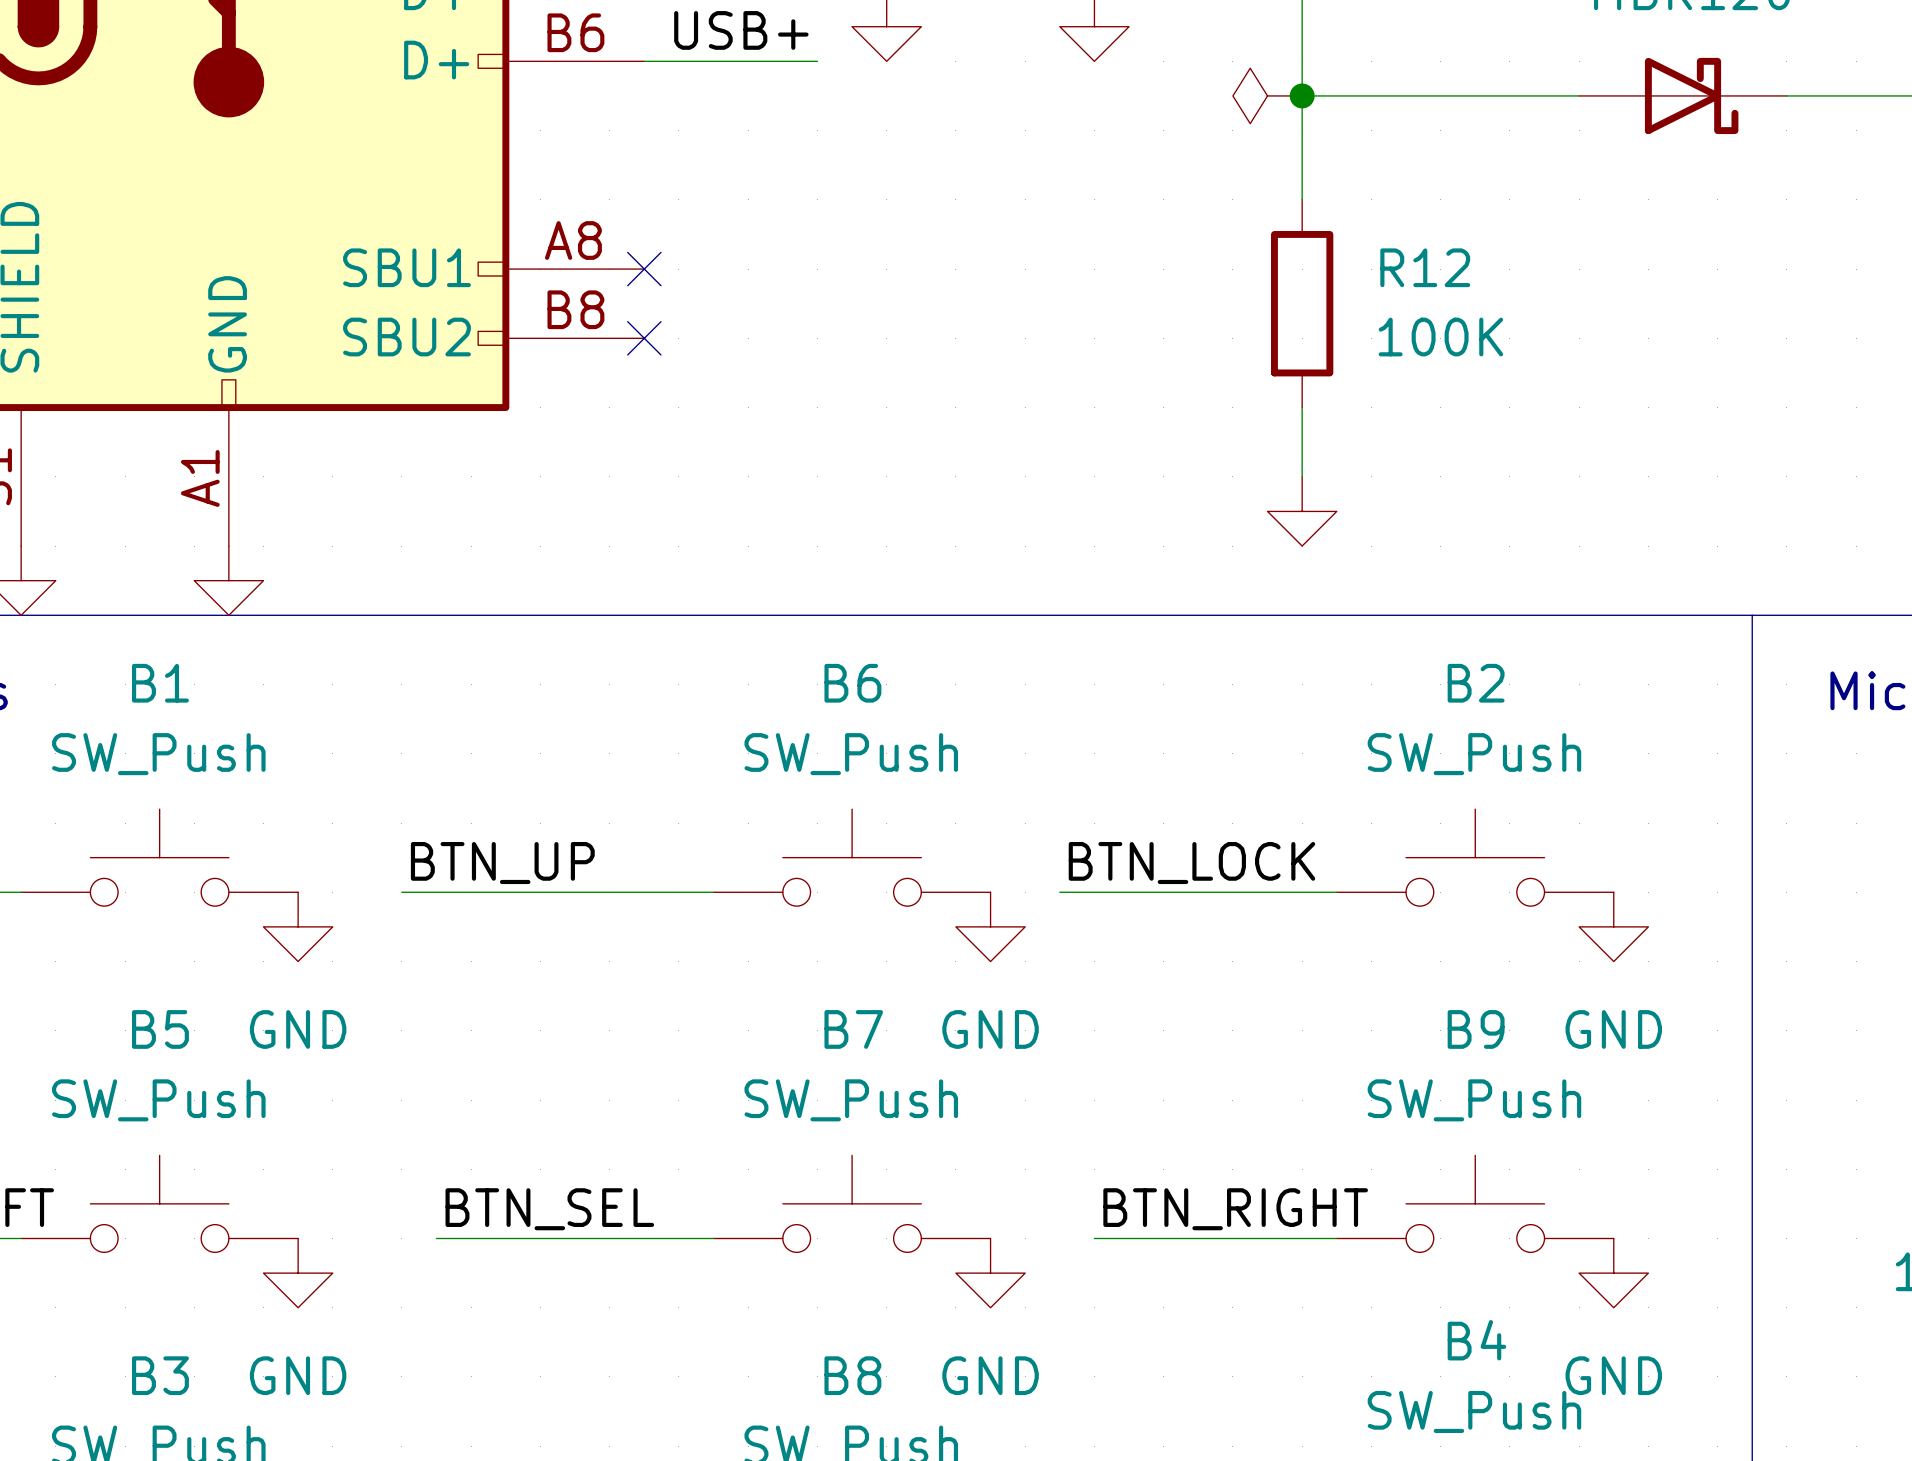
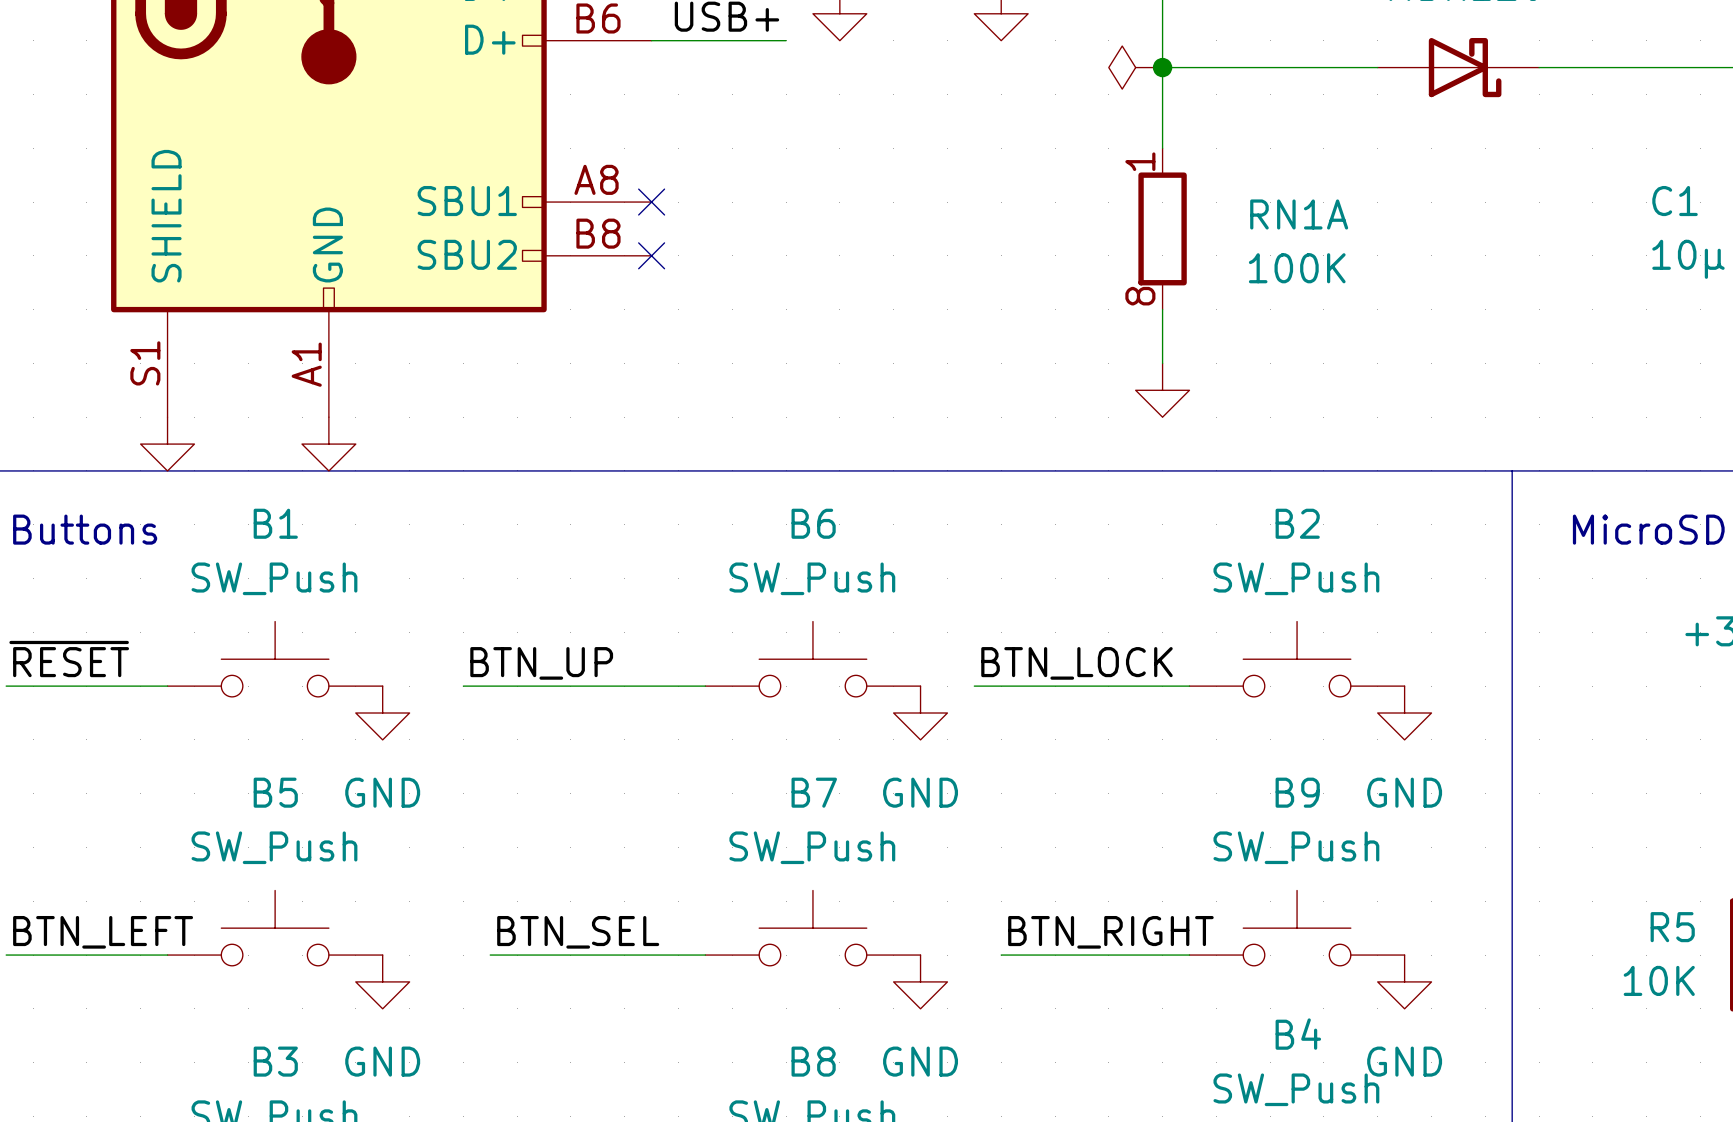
R12 pin number: none -> 1 (1140, 161)
R12 name: R12 (1425, 267) -> RN1A (1299, 214)
R12 value position: 100K (1440, 337) -> 100K (1297, 268)
R12 pin number: none -> 8 (1140, 296)

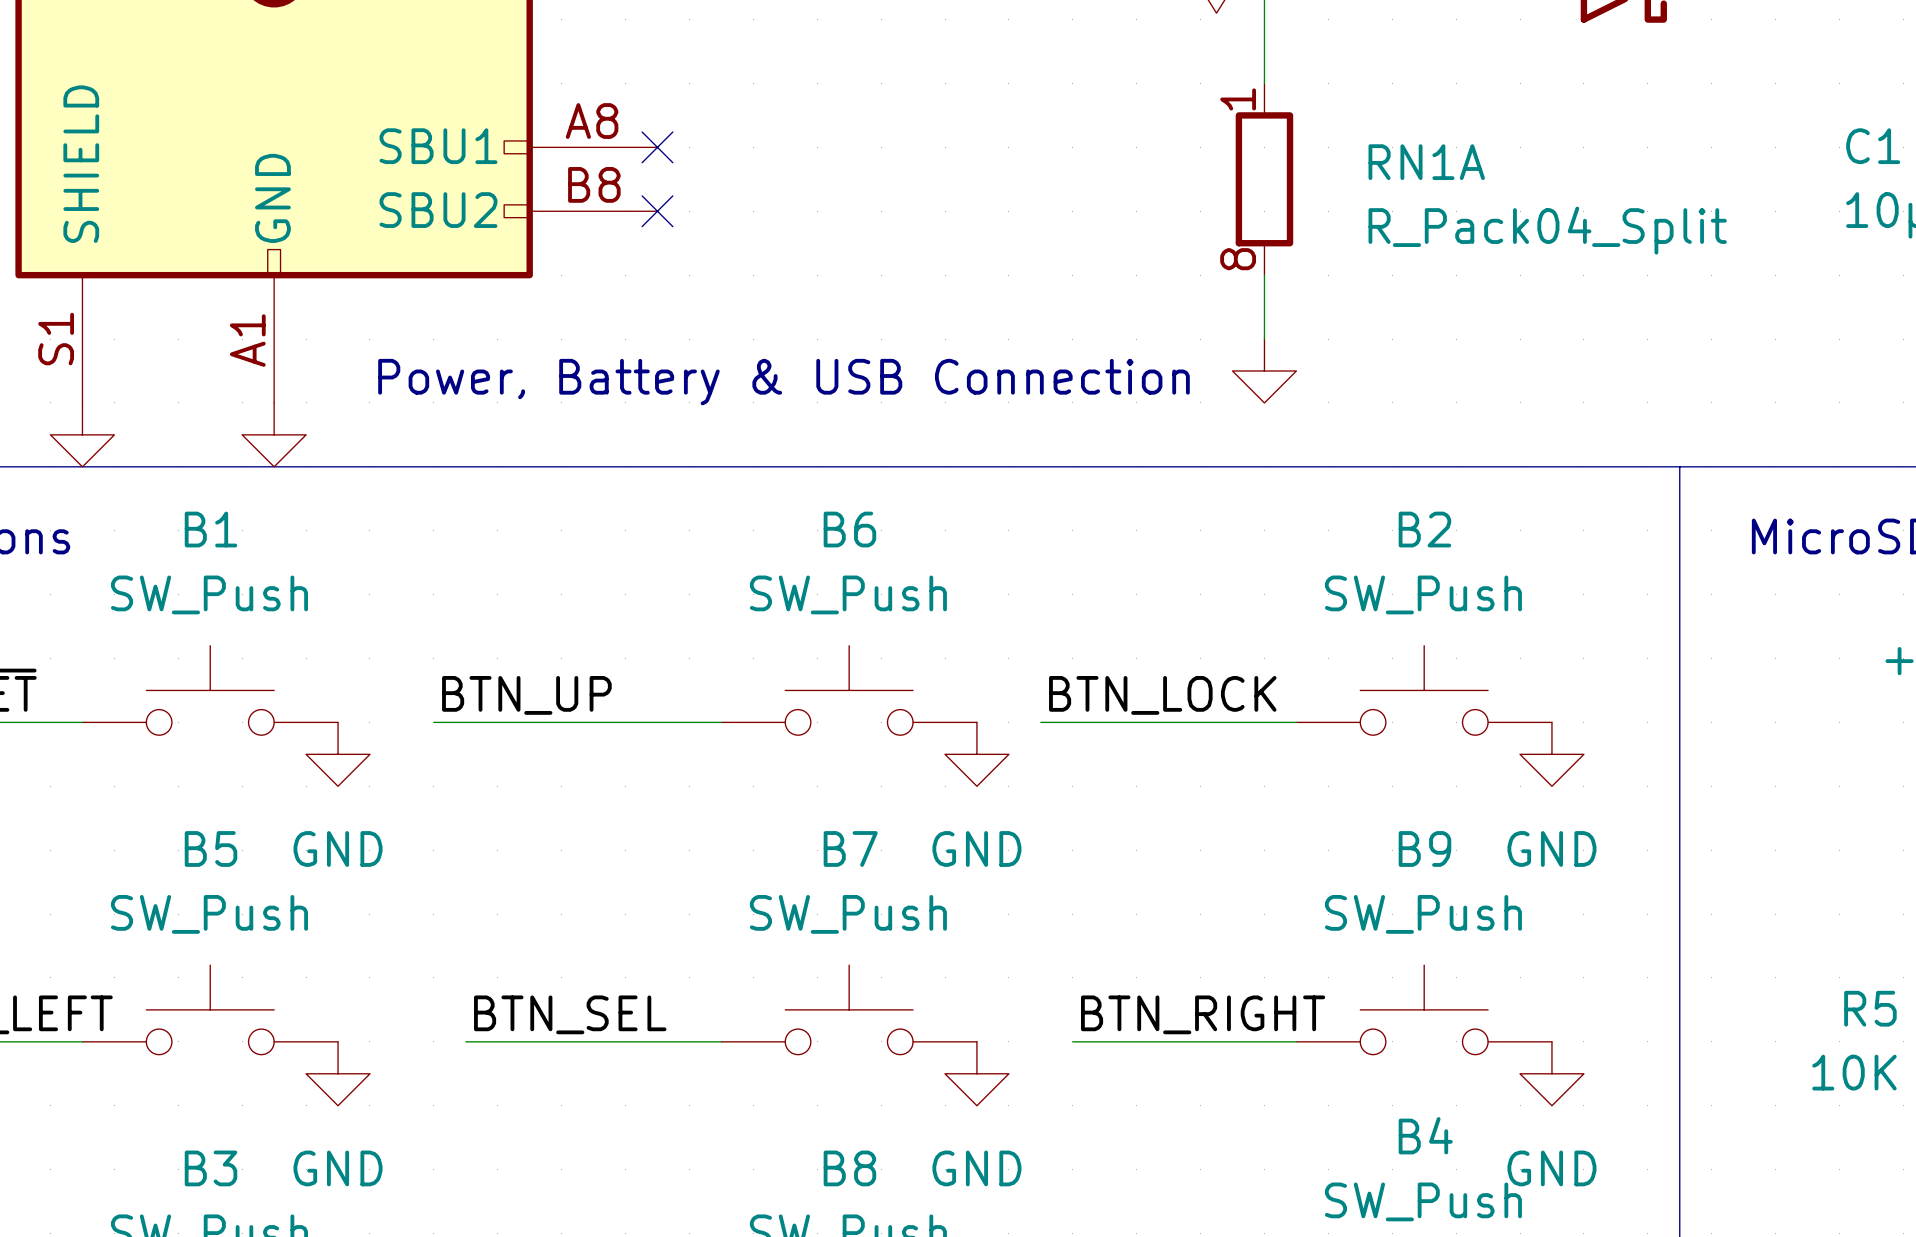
RN1A value: 100K (1297, 268) -> R_Pack04_Split (1547, 230)
text: none -> Power, Battery & USB Connection (783, 382)

